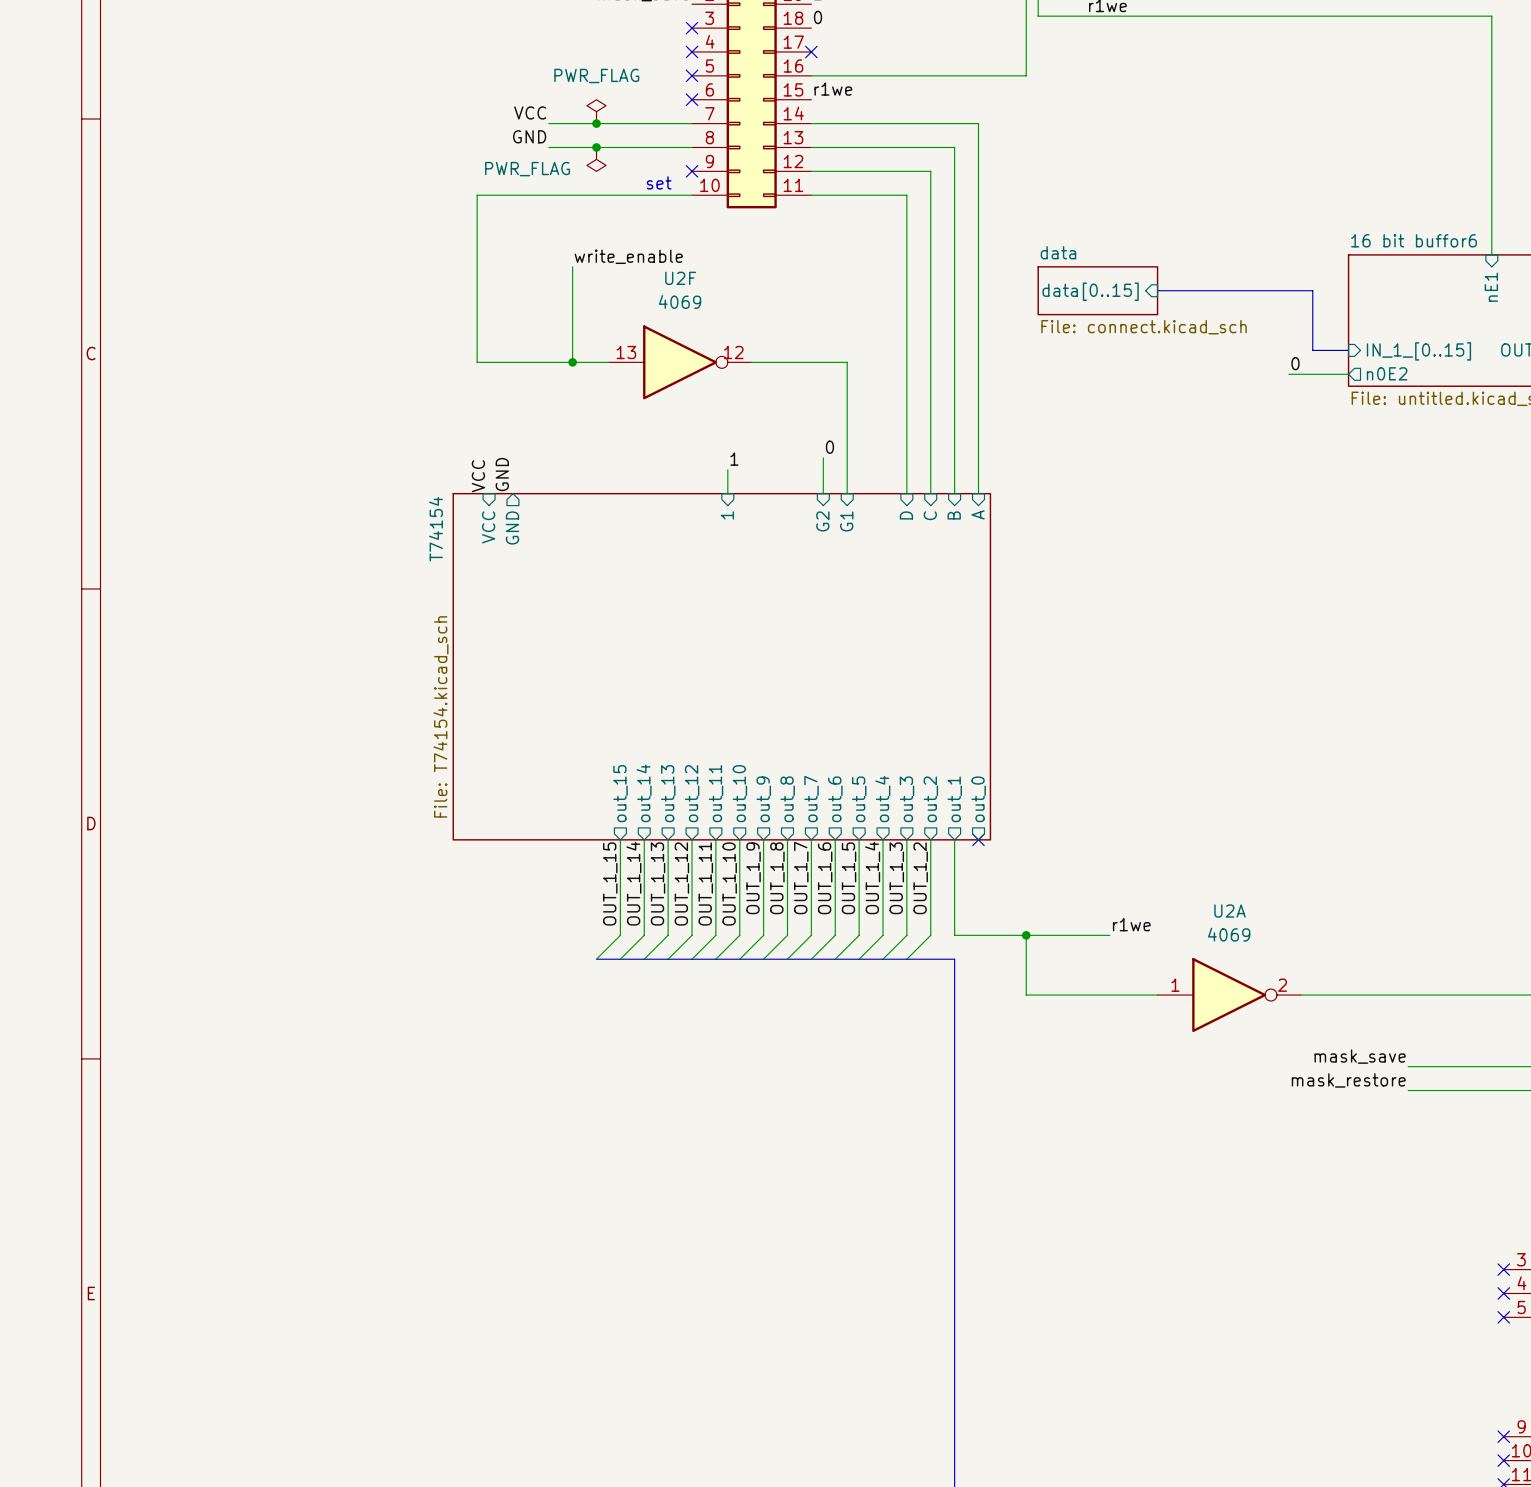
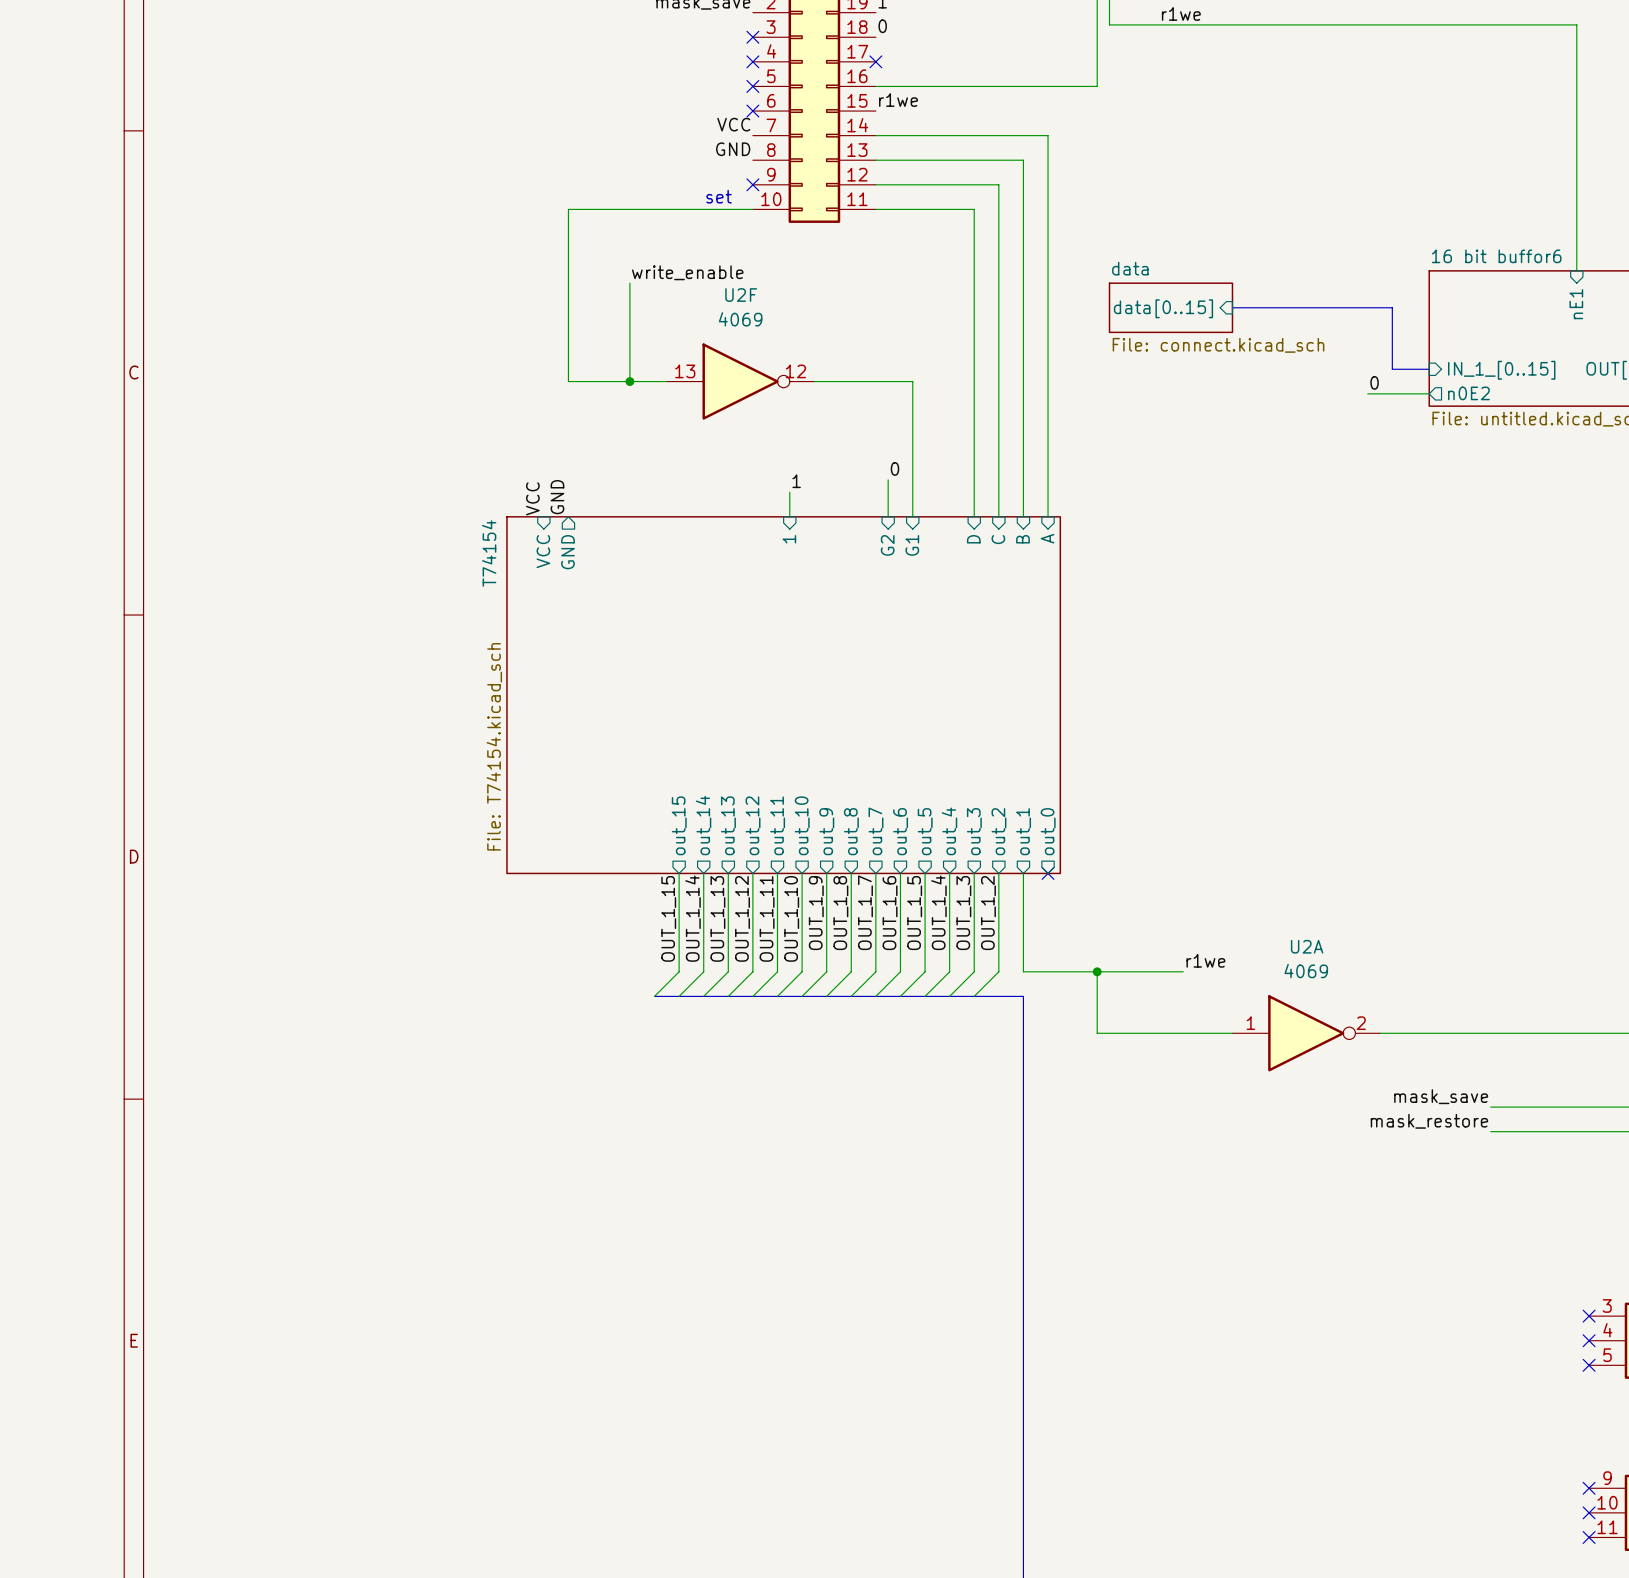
power symbol: PWR_FLAG (596, 111) -> none
label position: VCC (530, 112) -> VCC (733, 124)
wire: (548, 123) (692, 123) -> none
junction: (596, 123) -> none
label position: GND (529, 136) -> GND (733, 149)
wire: (548, 147) (692, 147) -> none
junction: (596, 147) -> none
power symbol: PWR_FLAG (596, 159) -> none
wire: (512, 195) (477, 195) (477, 362) (512, 362) -> (568, 209) (568, 381)

